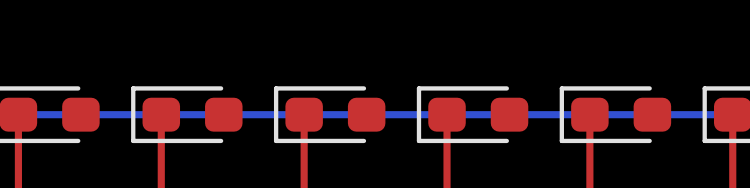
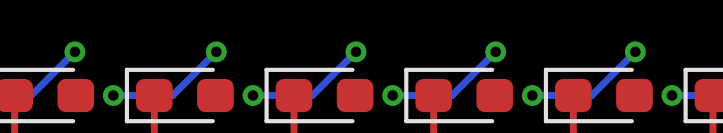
via: none -> (74, 51)
via: none -> (216, 51)
via: none -> (355, 51)
via: none -> (495, 51)
via: none -> (635, 51)
bottom track: (35, 114) (119, 114) -> (31, 95) (74, 51)
via: none -> (113, 95)
bottom track: (180, 114) (263, 114) -> (172, 95) (216, 51)
via: none -> (252, 95)
bottom track: (322, 114) (406, 114) -> (312, 95) (355, 51)
via: none -> (392, 95)
bottom track: (465, 114) (547, 114) -> (452, 95) (495, 51)
via: none -> (532, 95)
bottom track: (608, 114) (690, 114) -> (591, 95) (635, 51)
via: none -> (672, 95)

